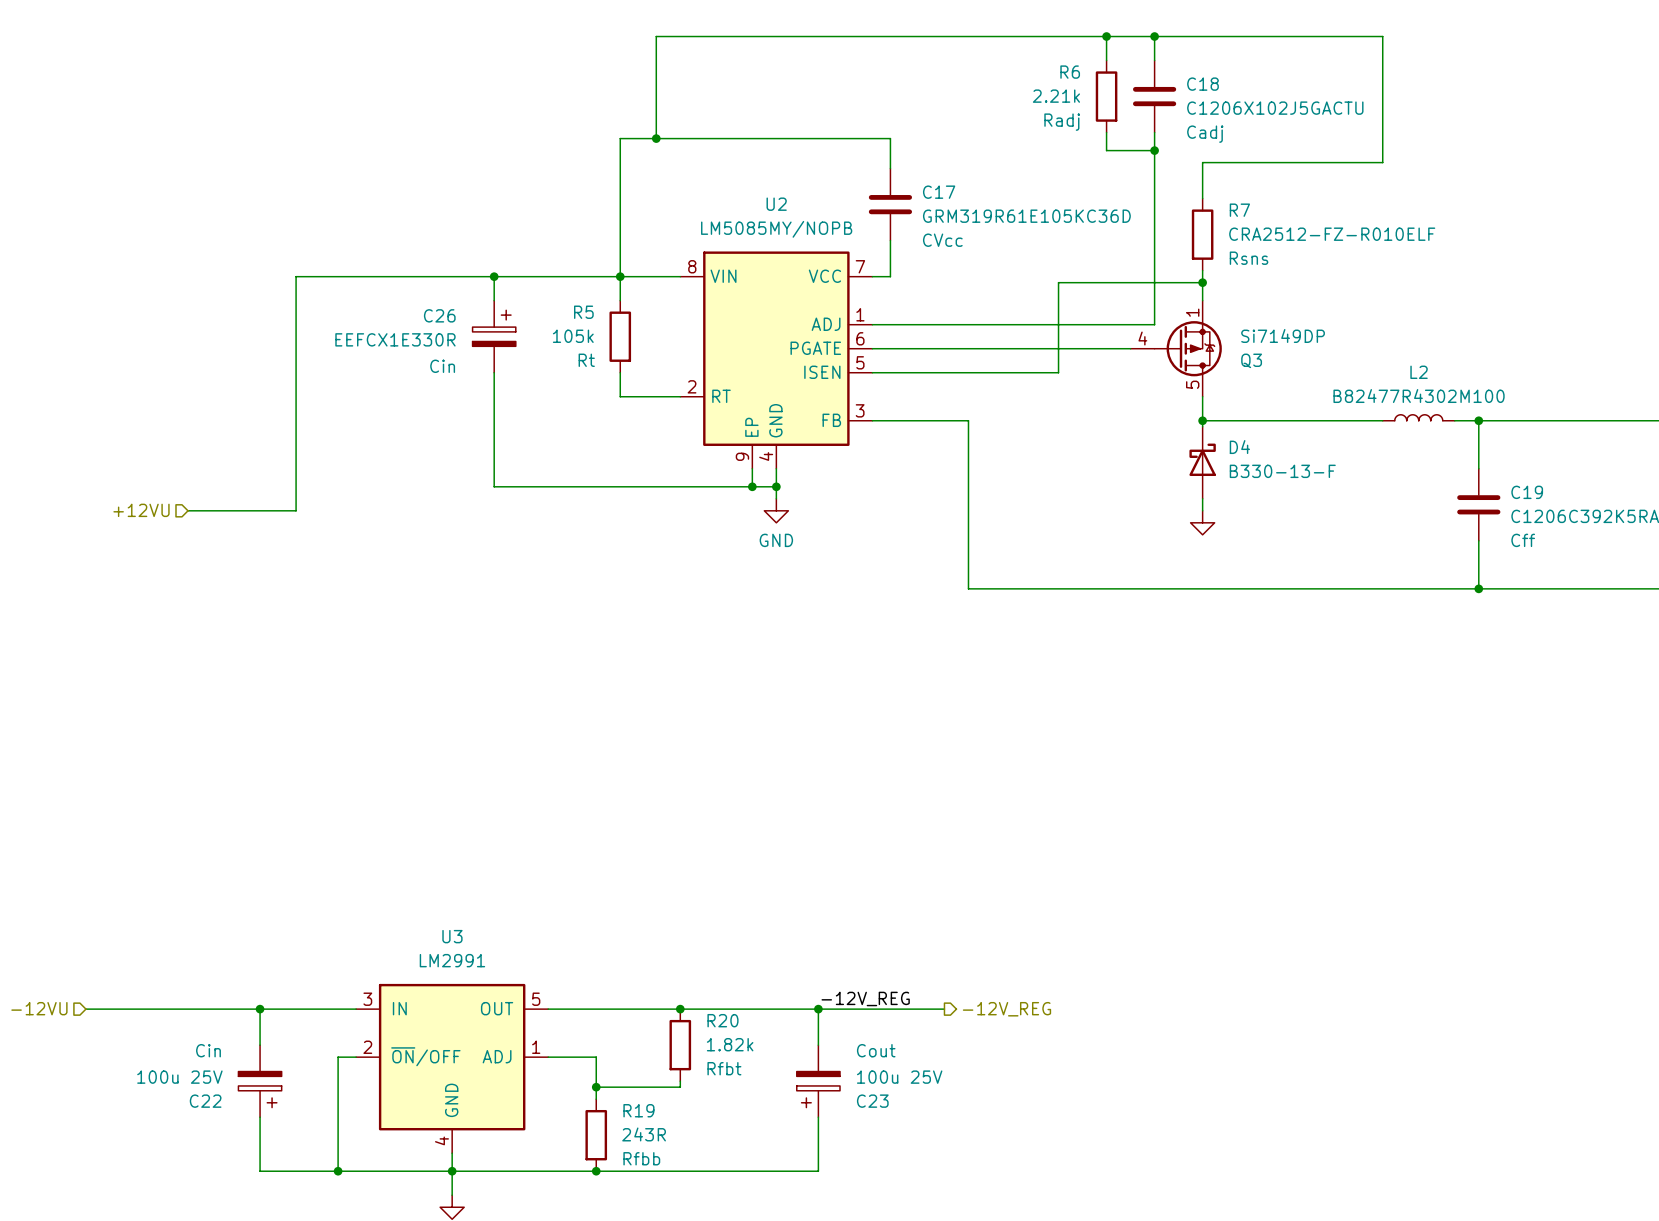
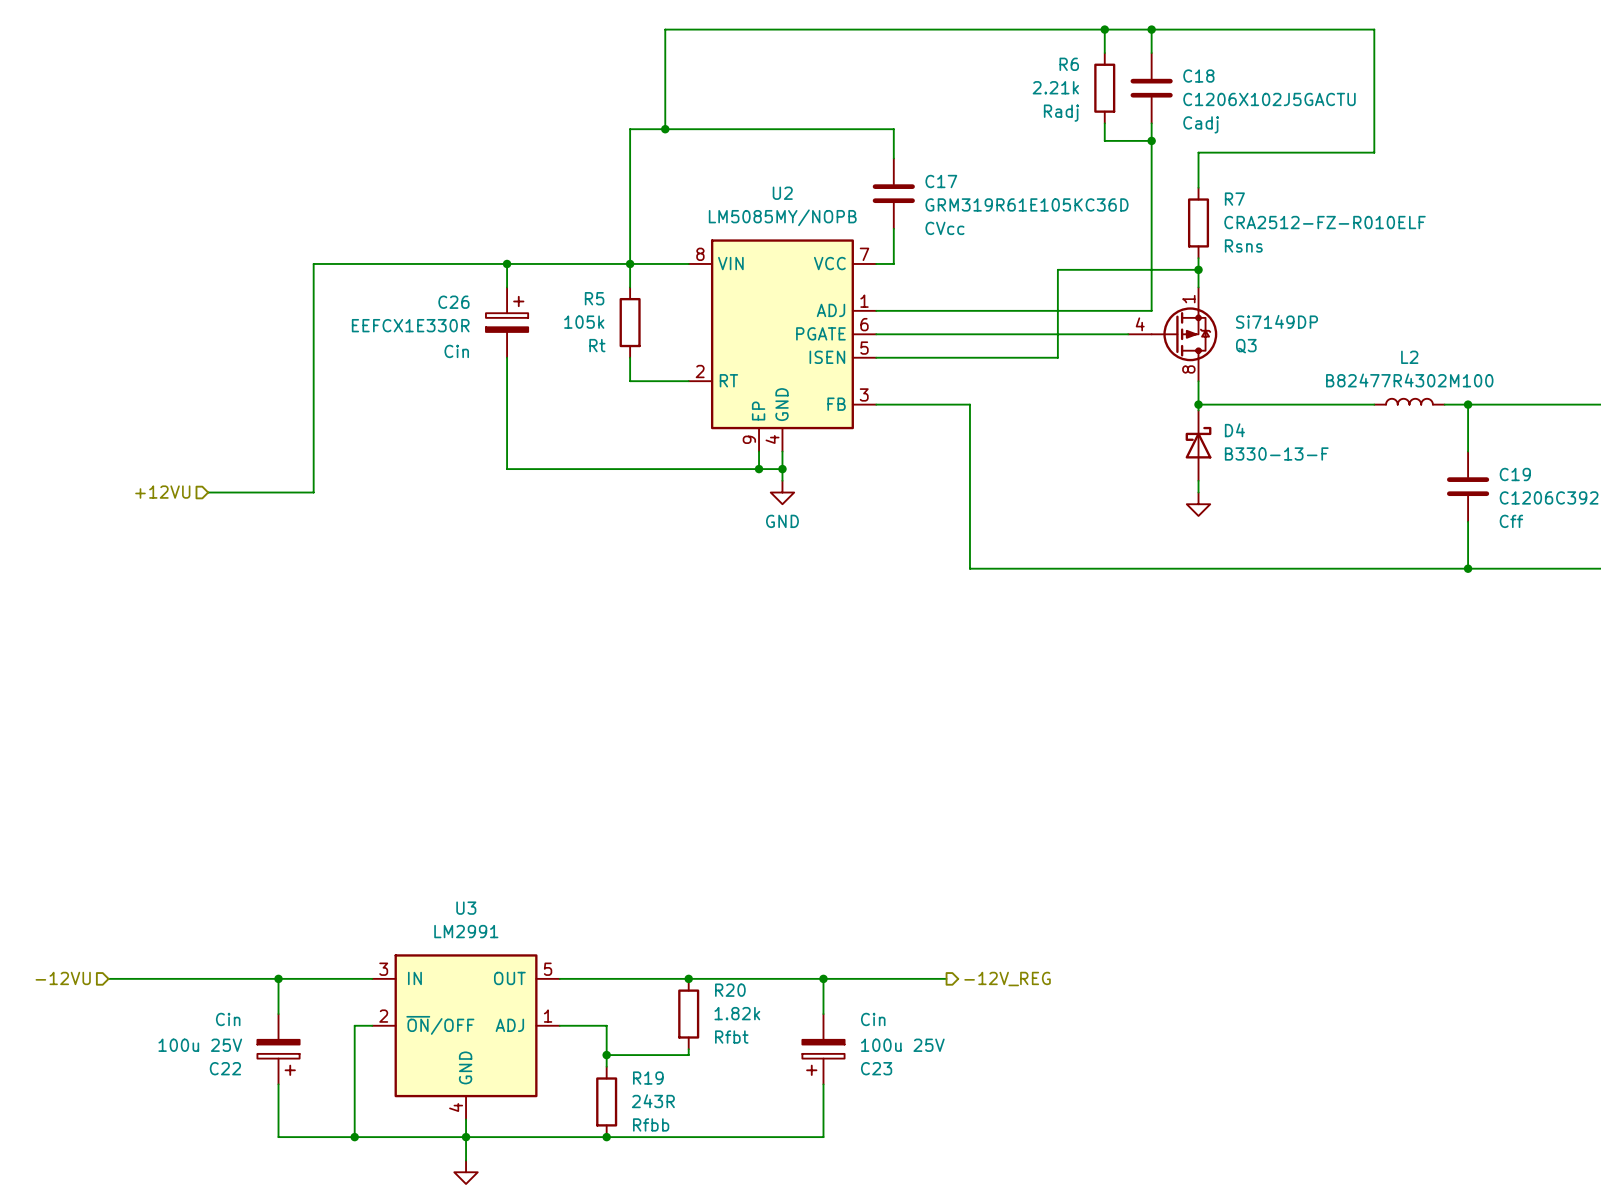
Q3 pin number: 5 (1192, 384) -> 8 (1188, 369)
label: -12V_REG (865, 998) -> none
C23 text: Cout (876, 1050) -> Cin (873, 1019)

